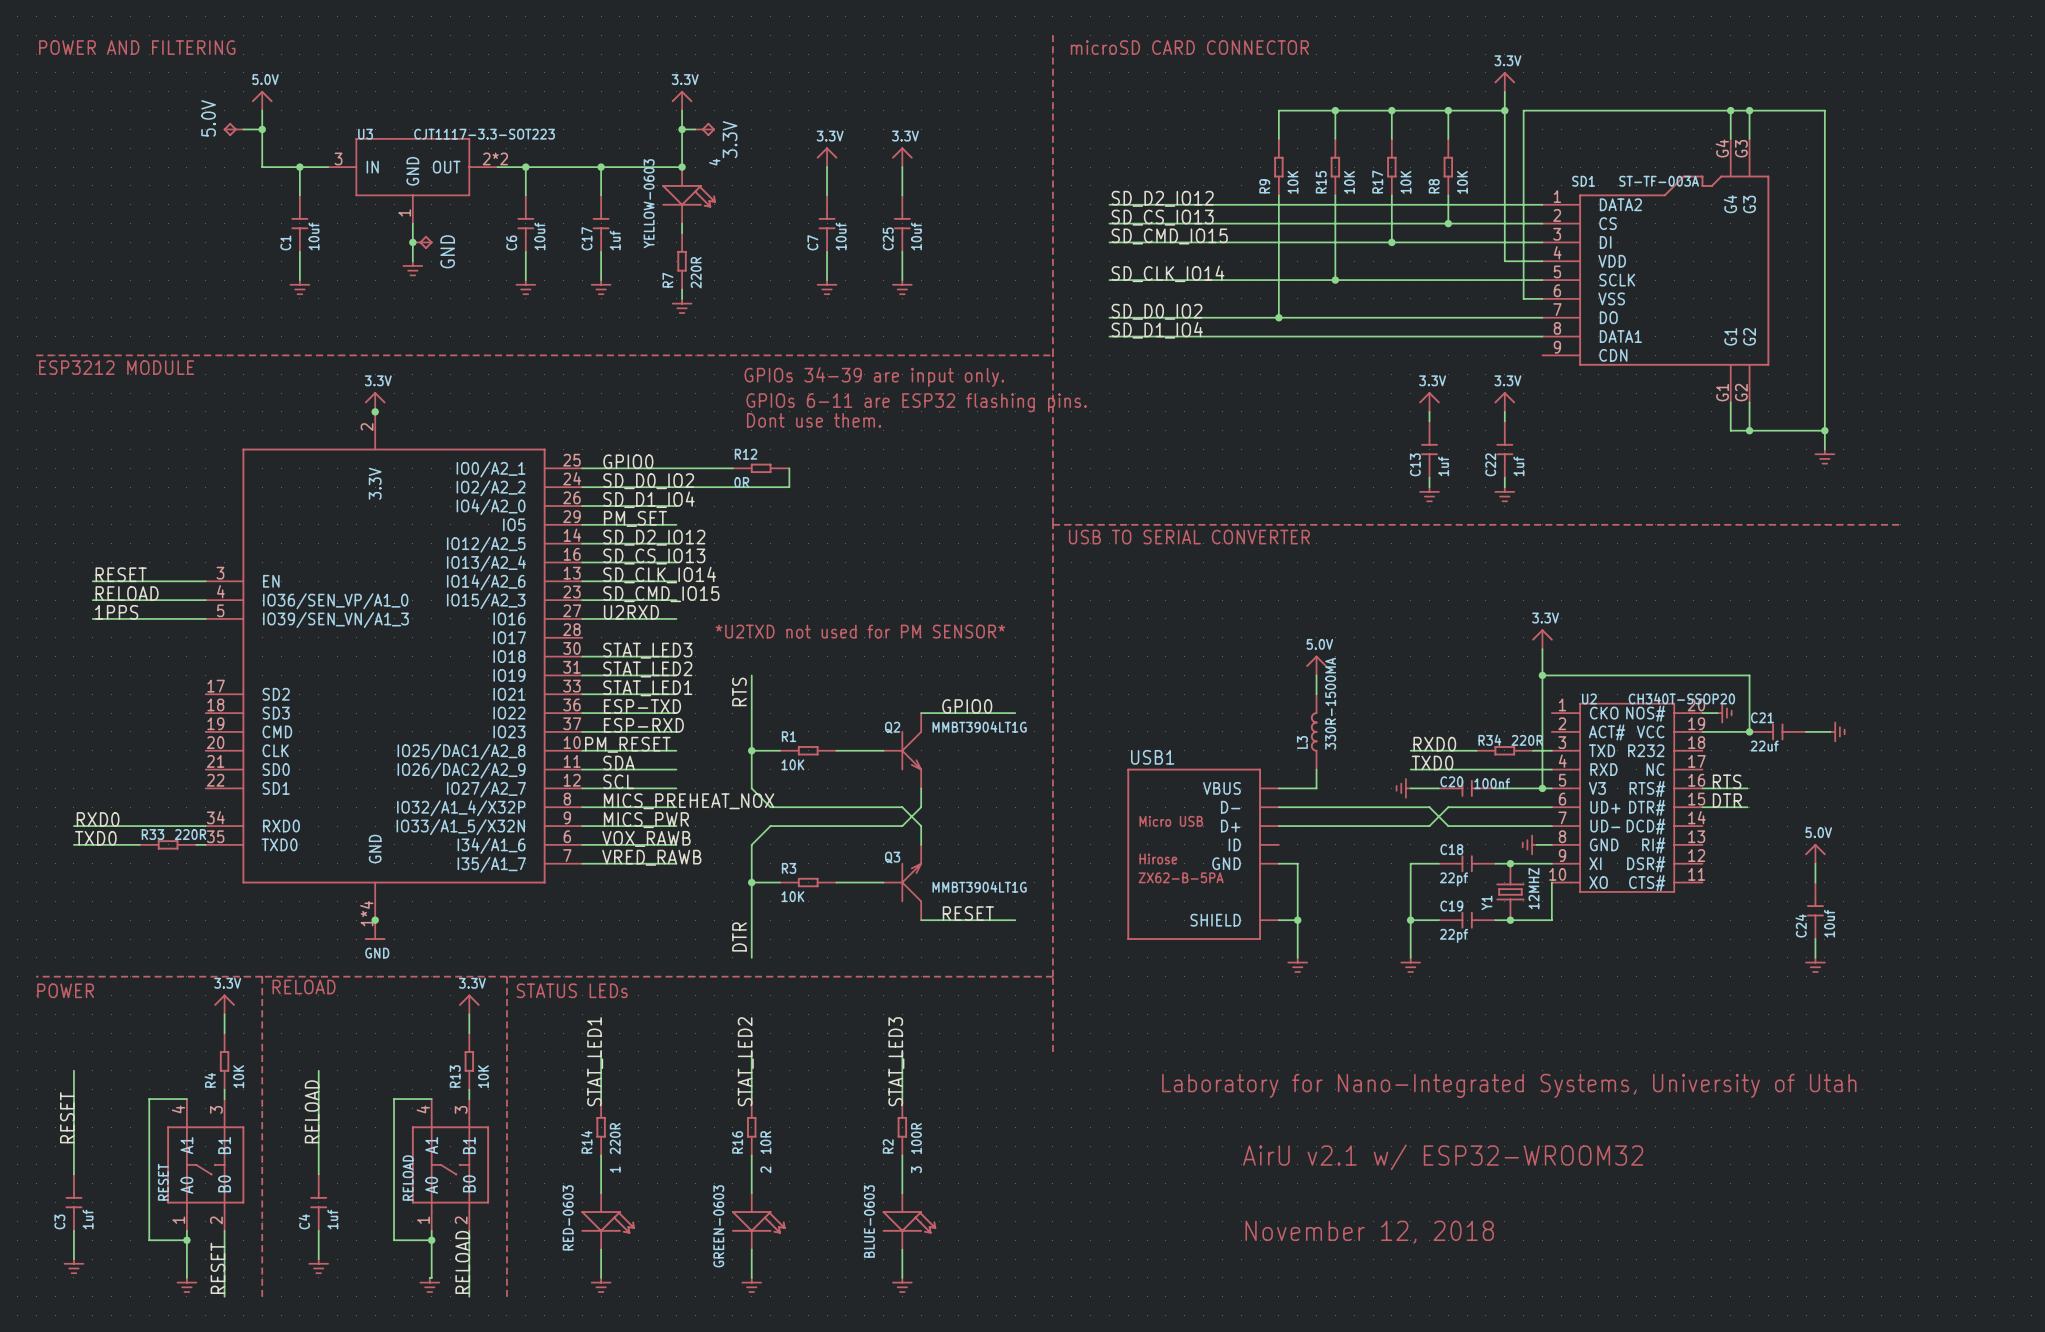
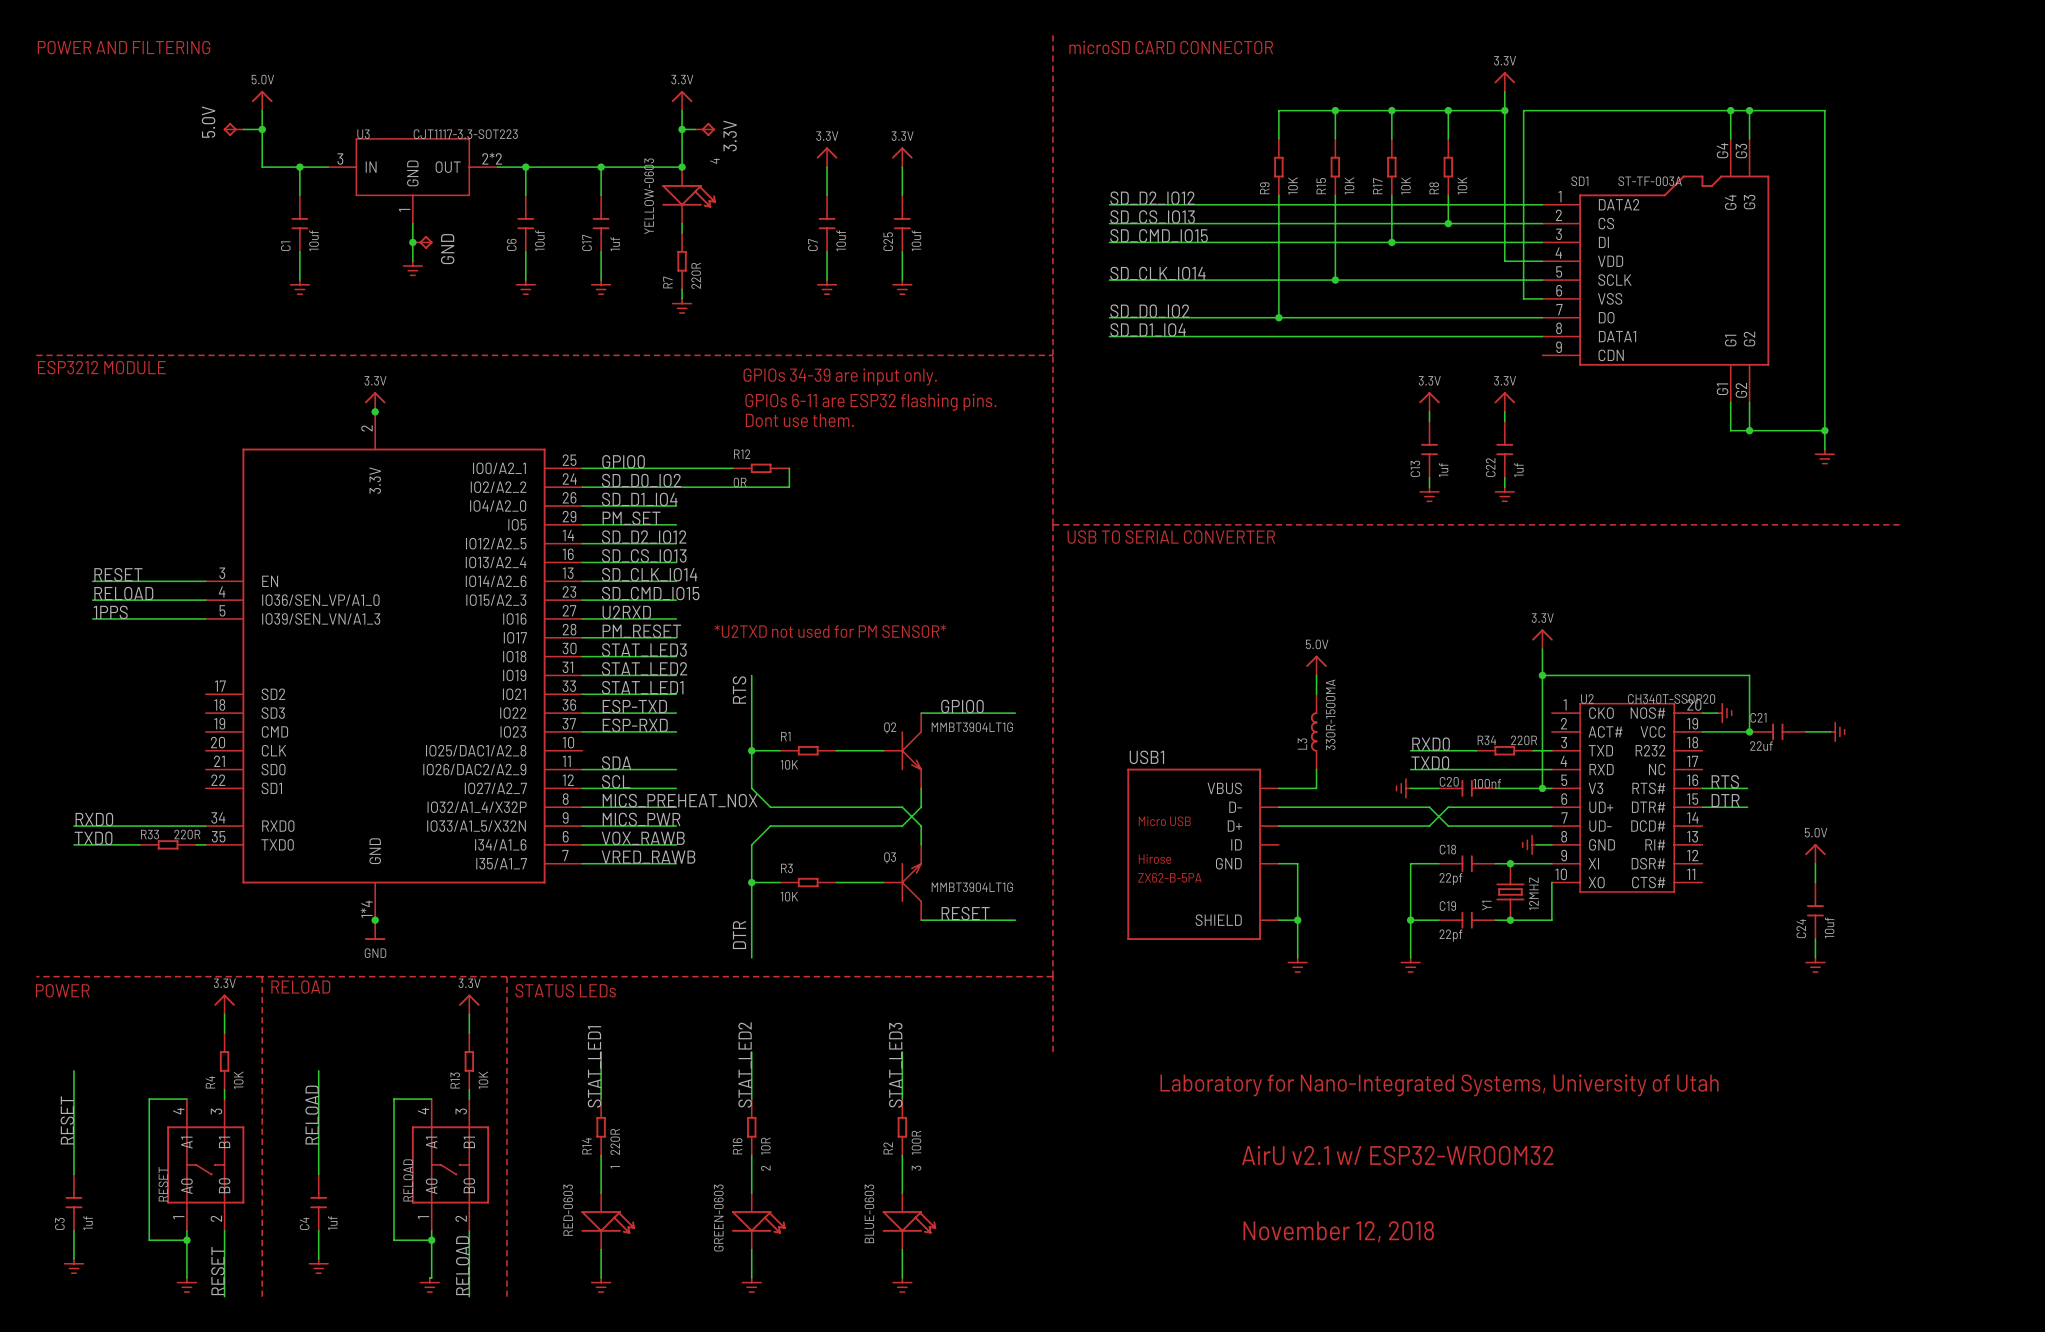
label position: PM_RESET (627, 744) -> PM_RESET (641, 631)
wire: (582, 750) (676, 750) -> (582, 637) (676, 637)

